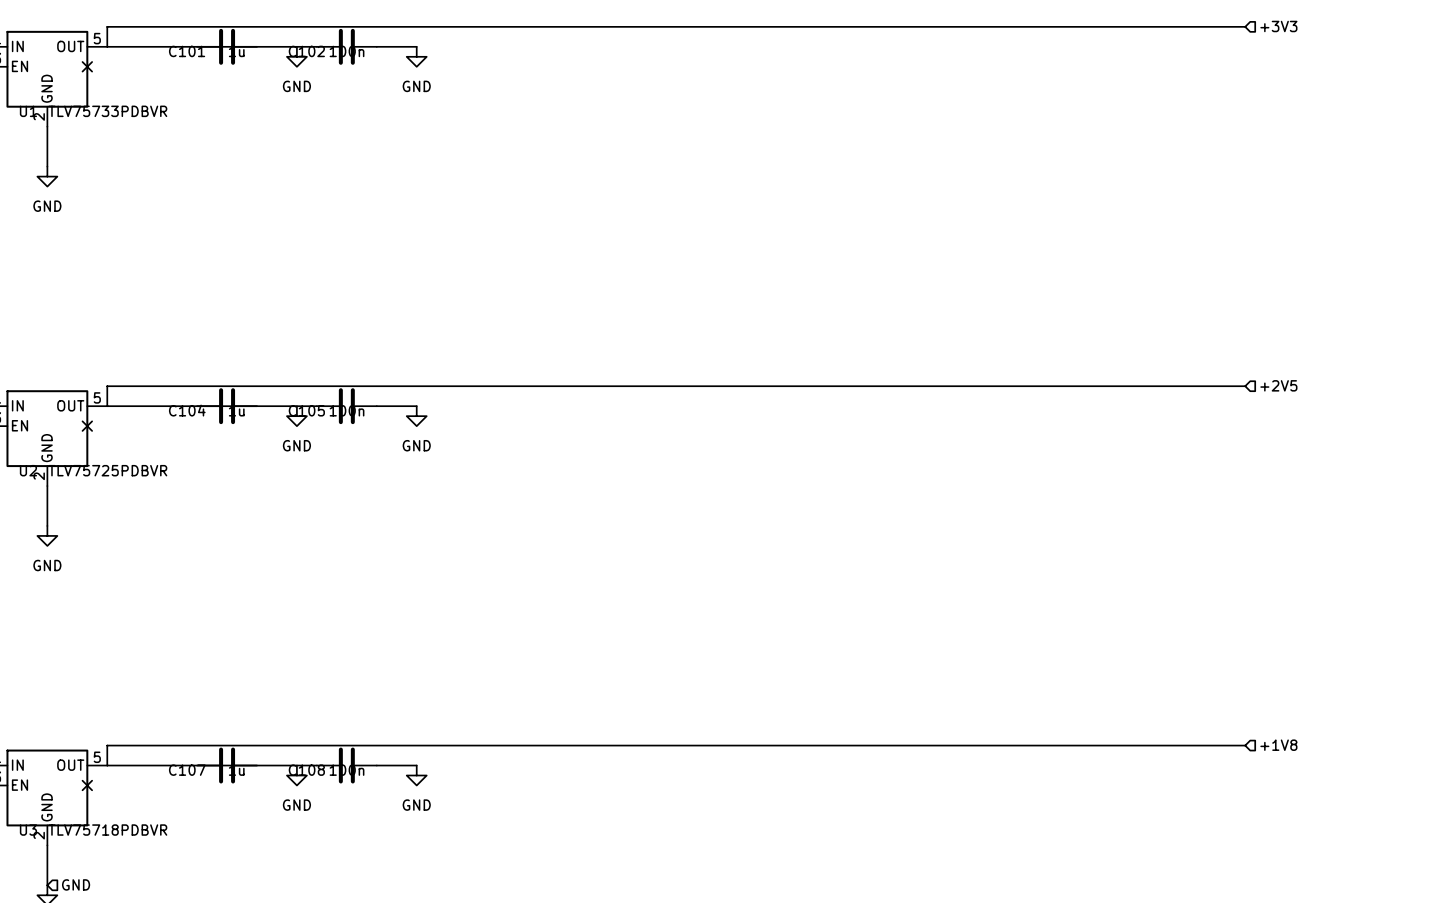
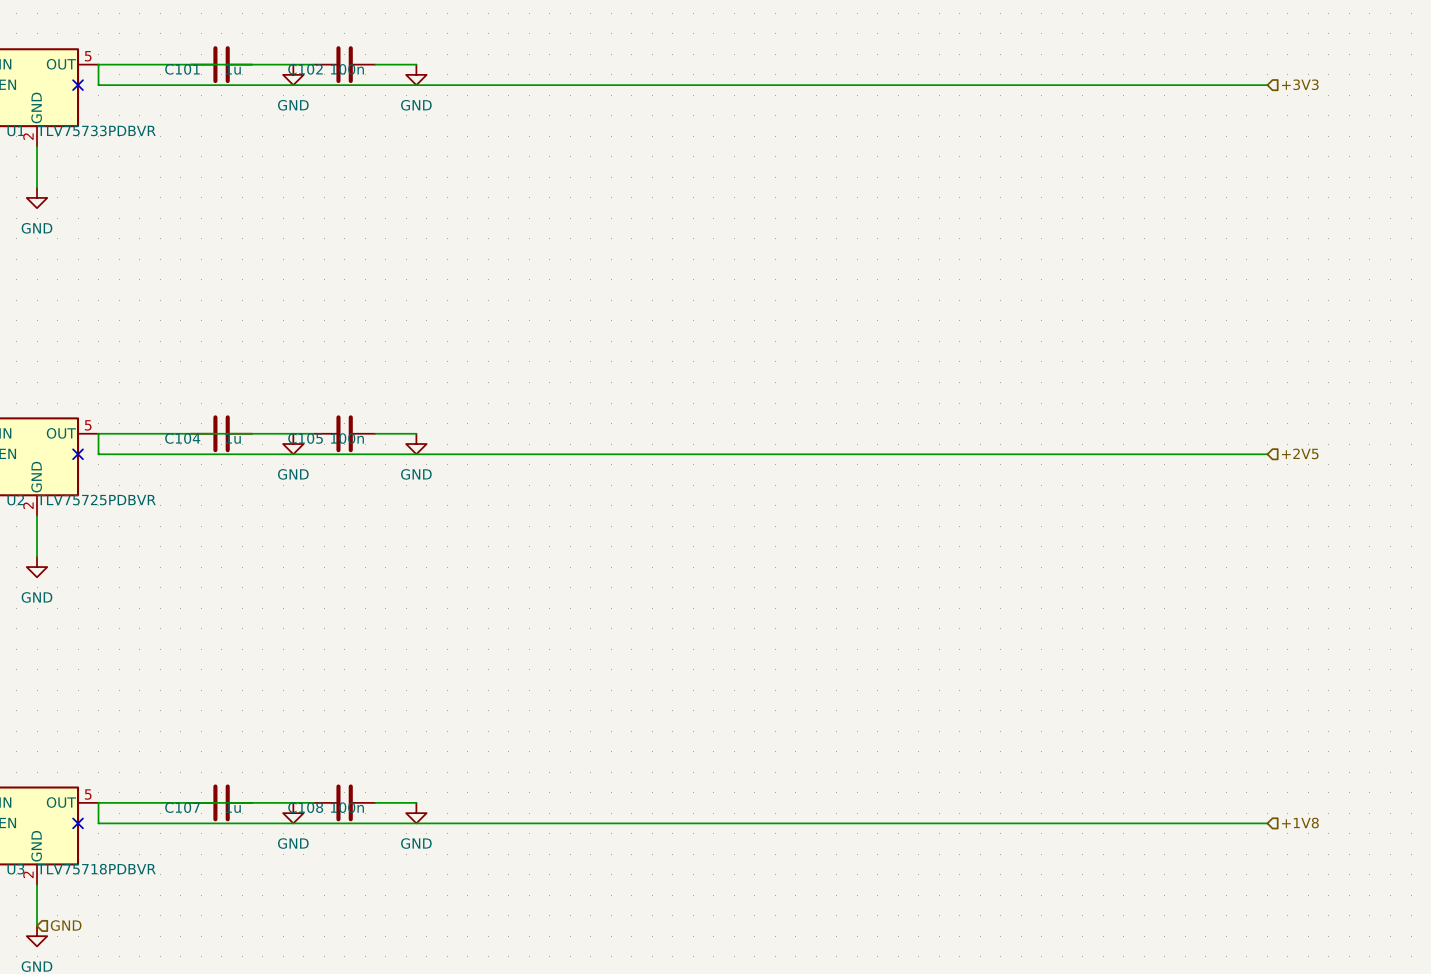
wire: (1245, 26) (107, 26) (107, 46) -> (1267, 85) (98, 85) (98, 64)
hierarchical label position: +3V3 (1278, 26) -> +3V3 (1300, 84)
hierarchical label position: +2V5 (1278, 385) -> +2V5 (1300, 453)
wire: (1245, 386) (107, 386) (107, 406) -> (1267, 454) (98, 454) (98, 433)
wire: (1245, 745) (107, 745) (107, 765) -> (1267, 823) (98, 823) (98, 802)
hierarchical label position: +1V8 (1278, 745) -> +1V8 (1300, 823)

